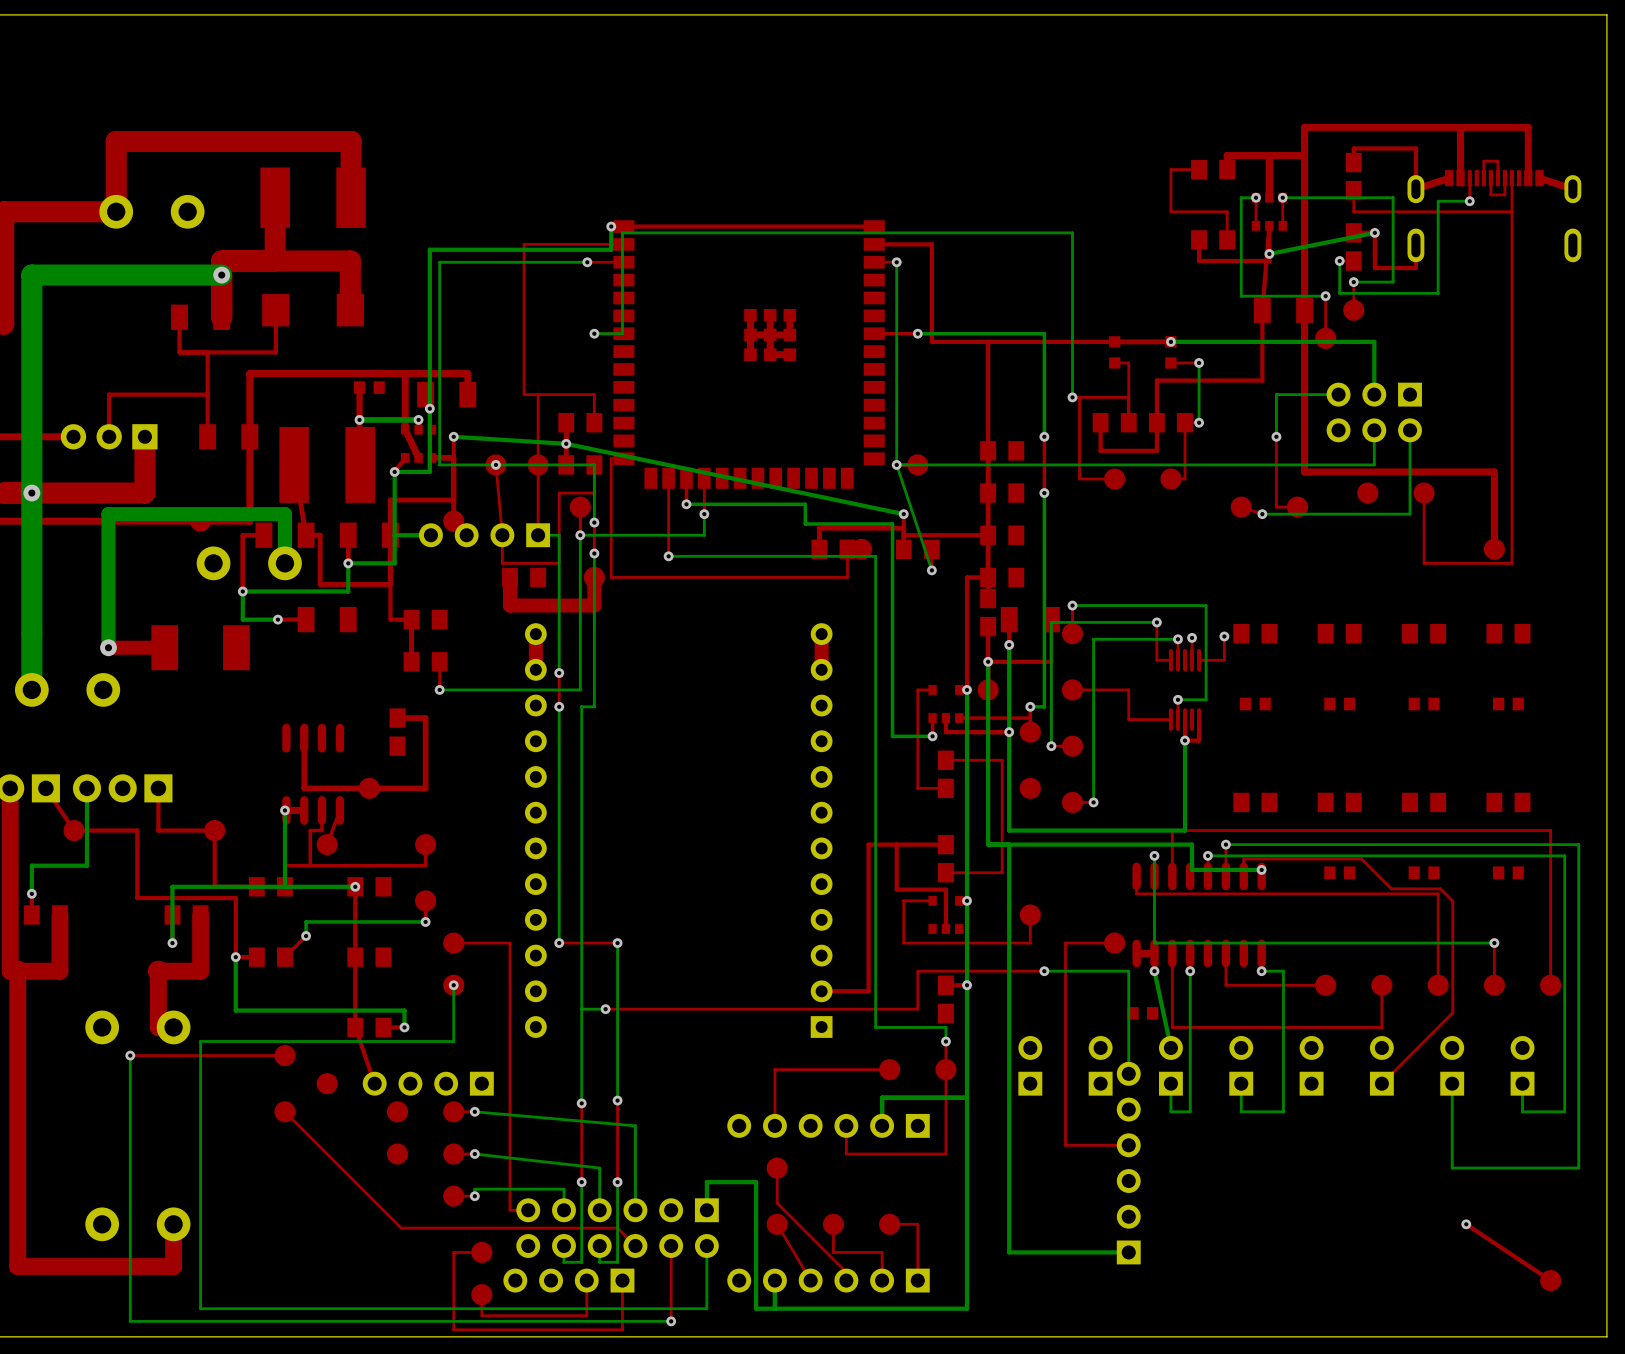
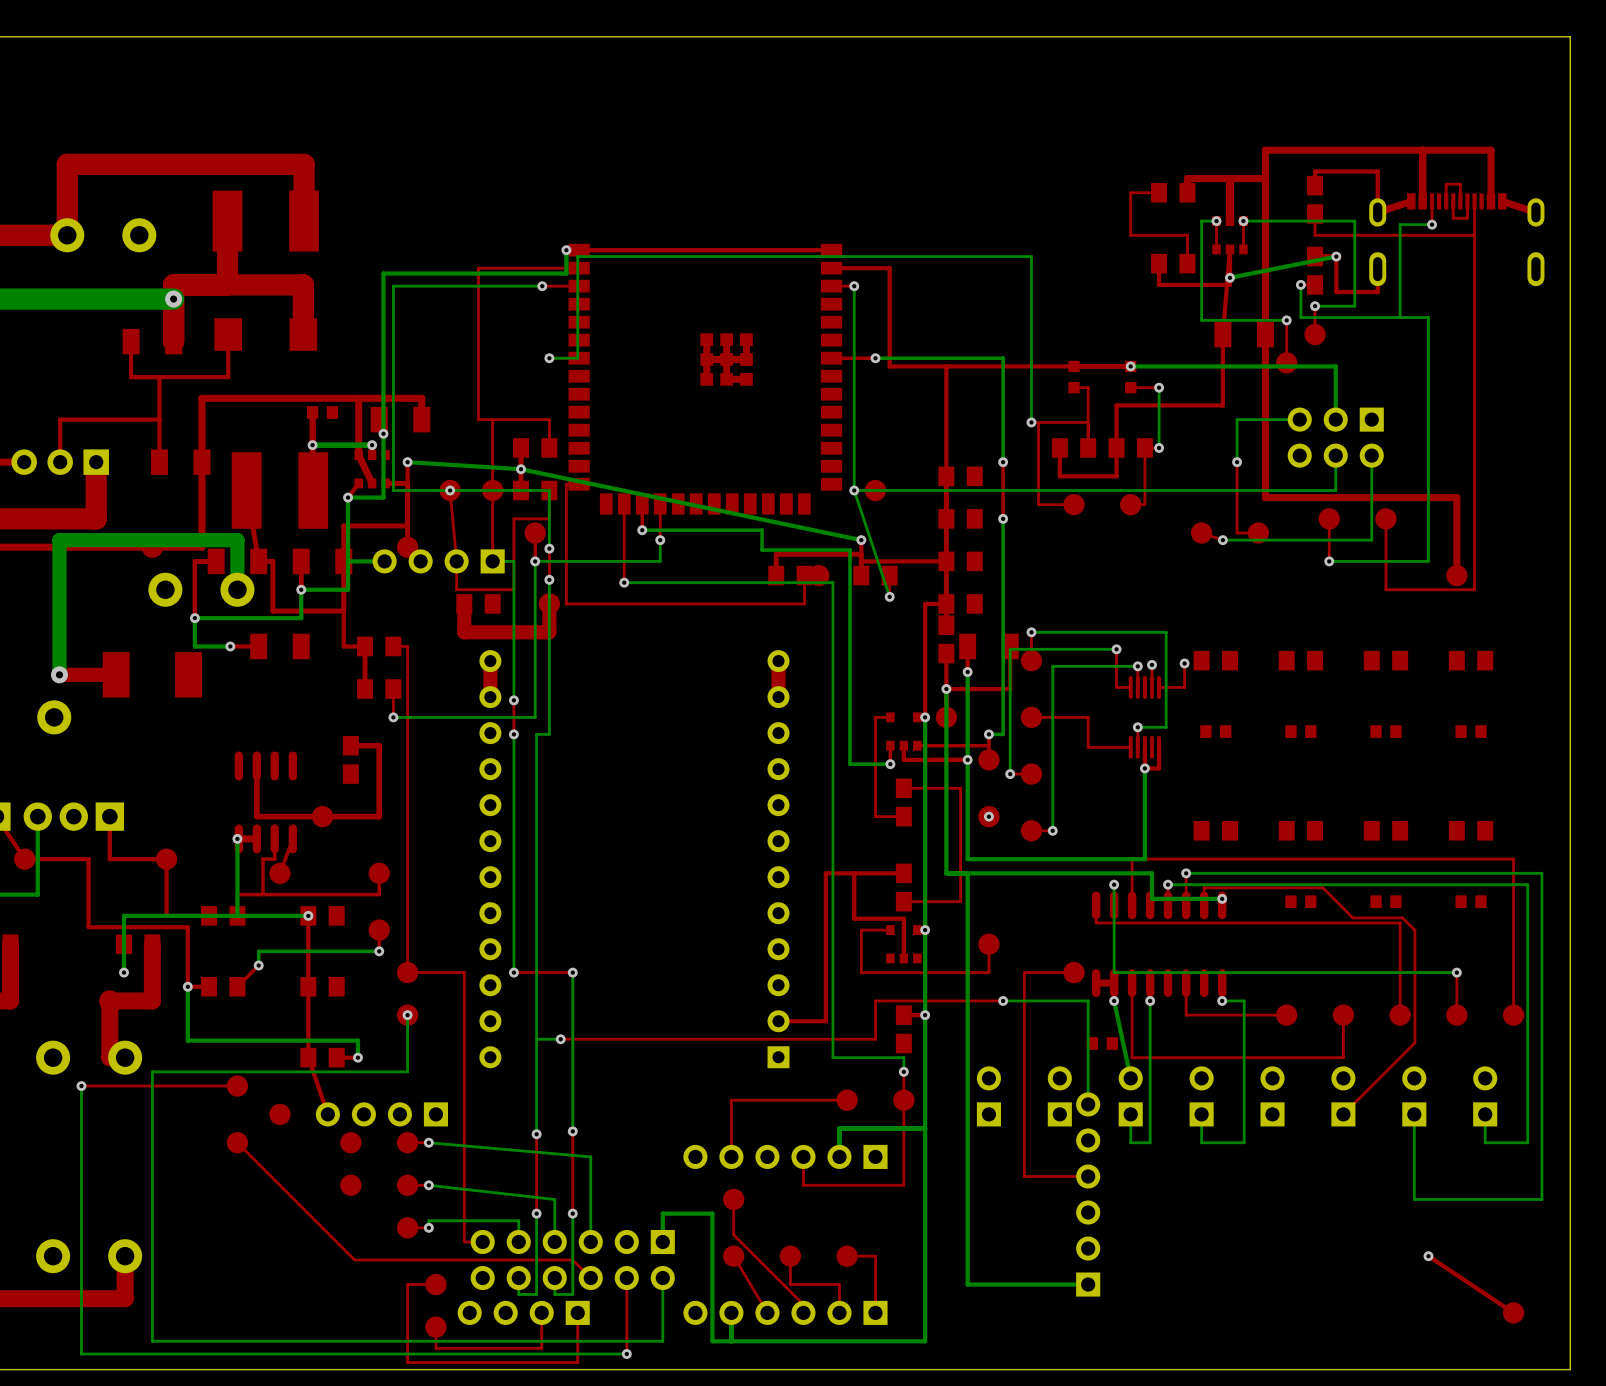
bottom track: none -> (1400, 317) (1428, 317) (1428, 561) (1329, 561)
top track: none -> (1329, 518) (1329, 561)
via: none -> (1329, 561)
top track: none -> (393, 646) (407, 646) (407, 972)
via: none -> (988, 816)

